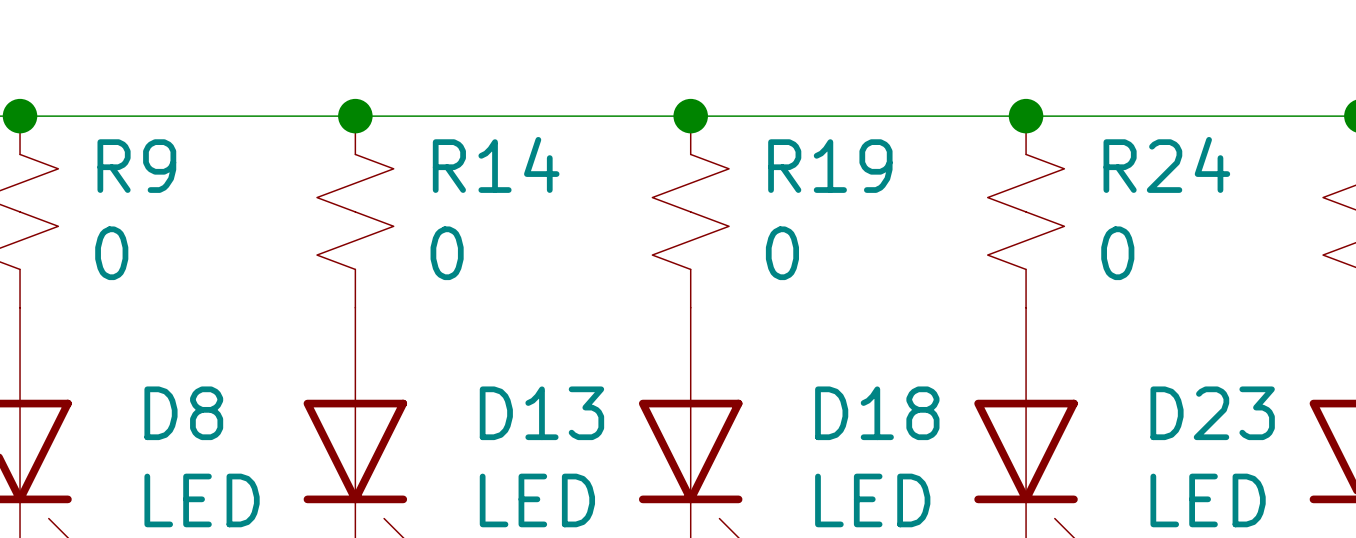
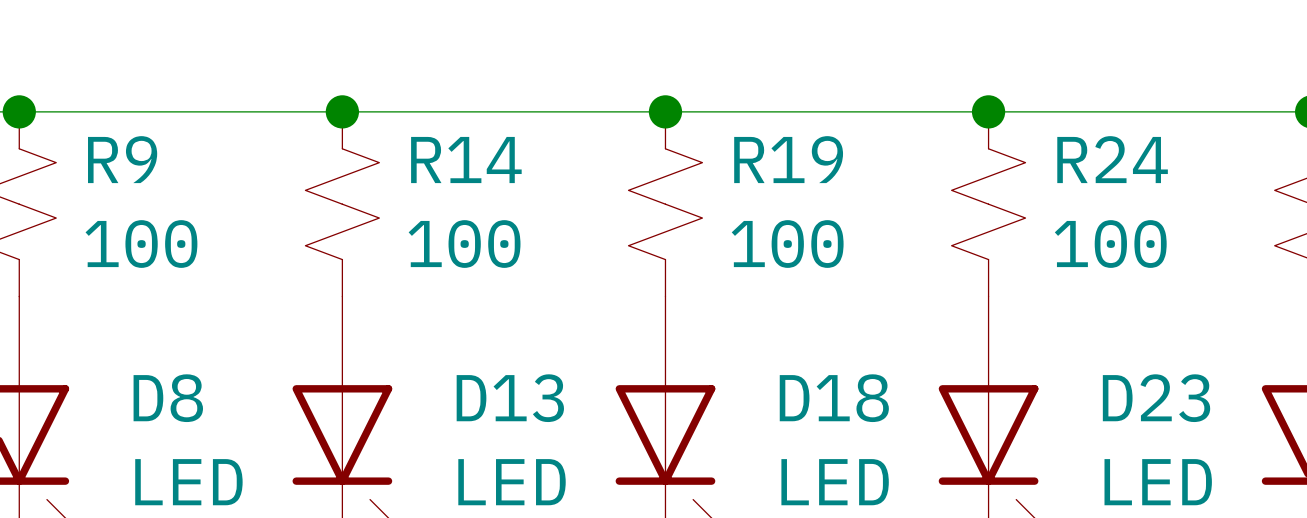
R9 value: 0 (111, 253) -> 100 (141, 244)
R14 value: 0 (447, 253) -> 100 (464, 244)
R19 value: 0 (782, 253) -> 100 (787, 244)
R24 value: 0 (1117, 253) -> 100 (1110, 244)

